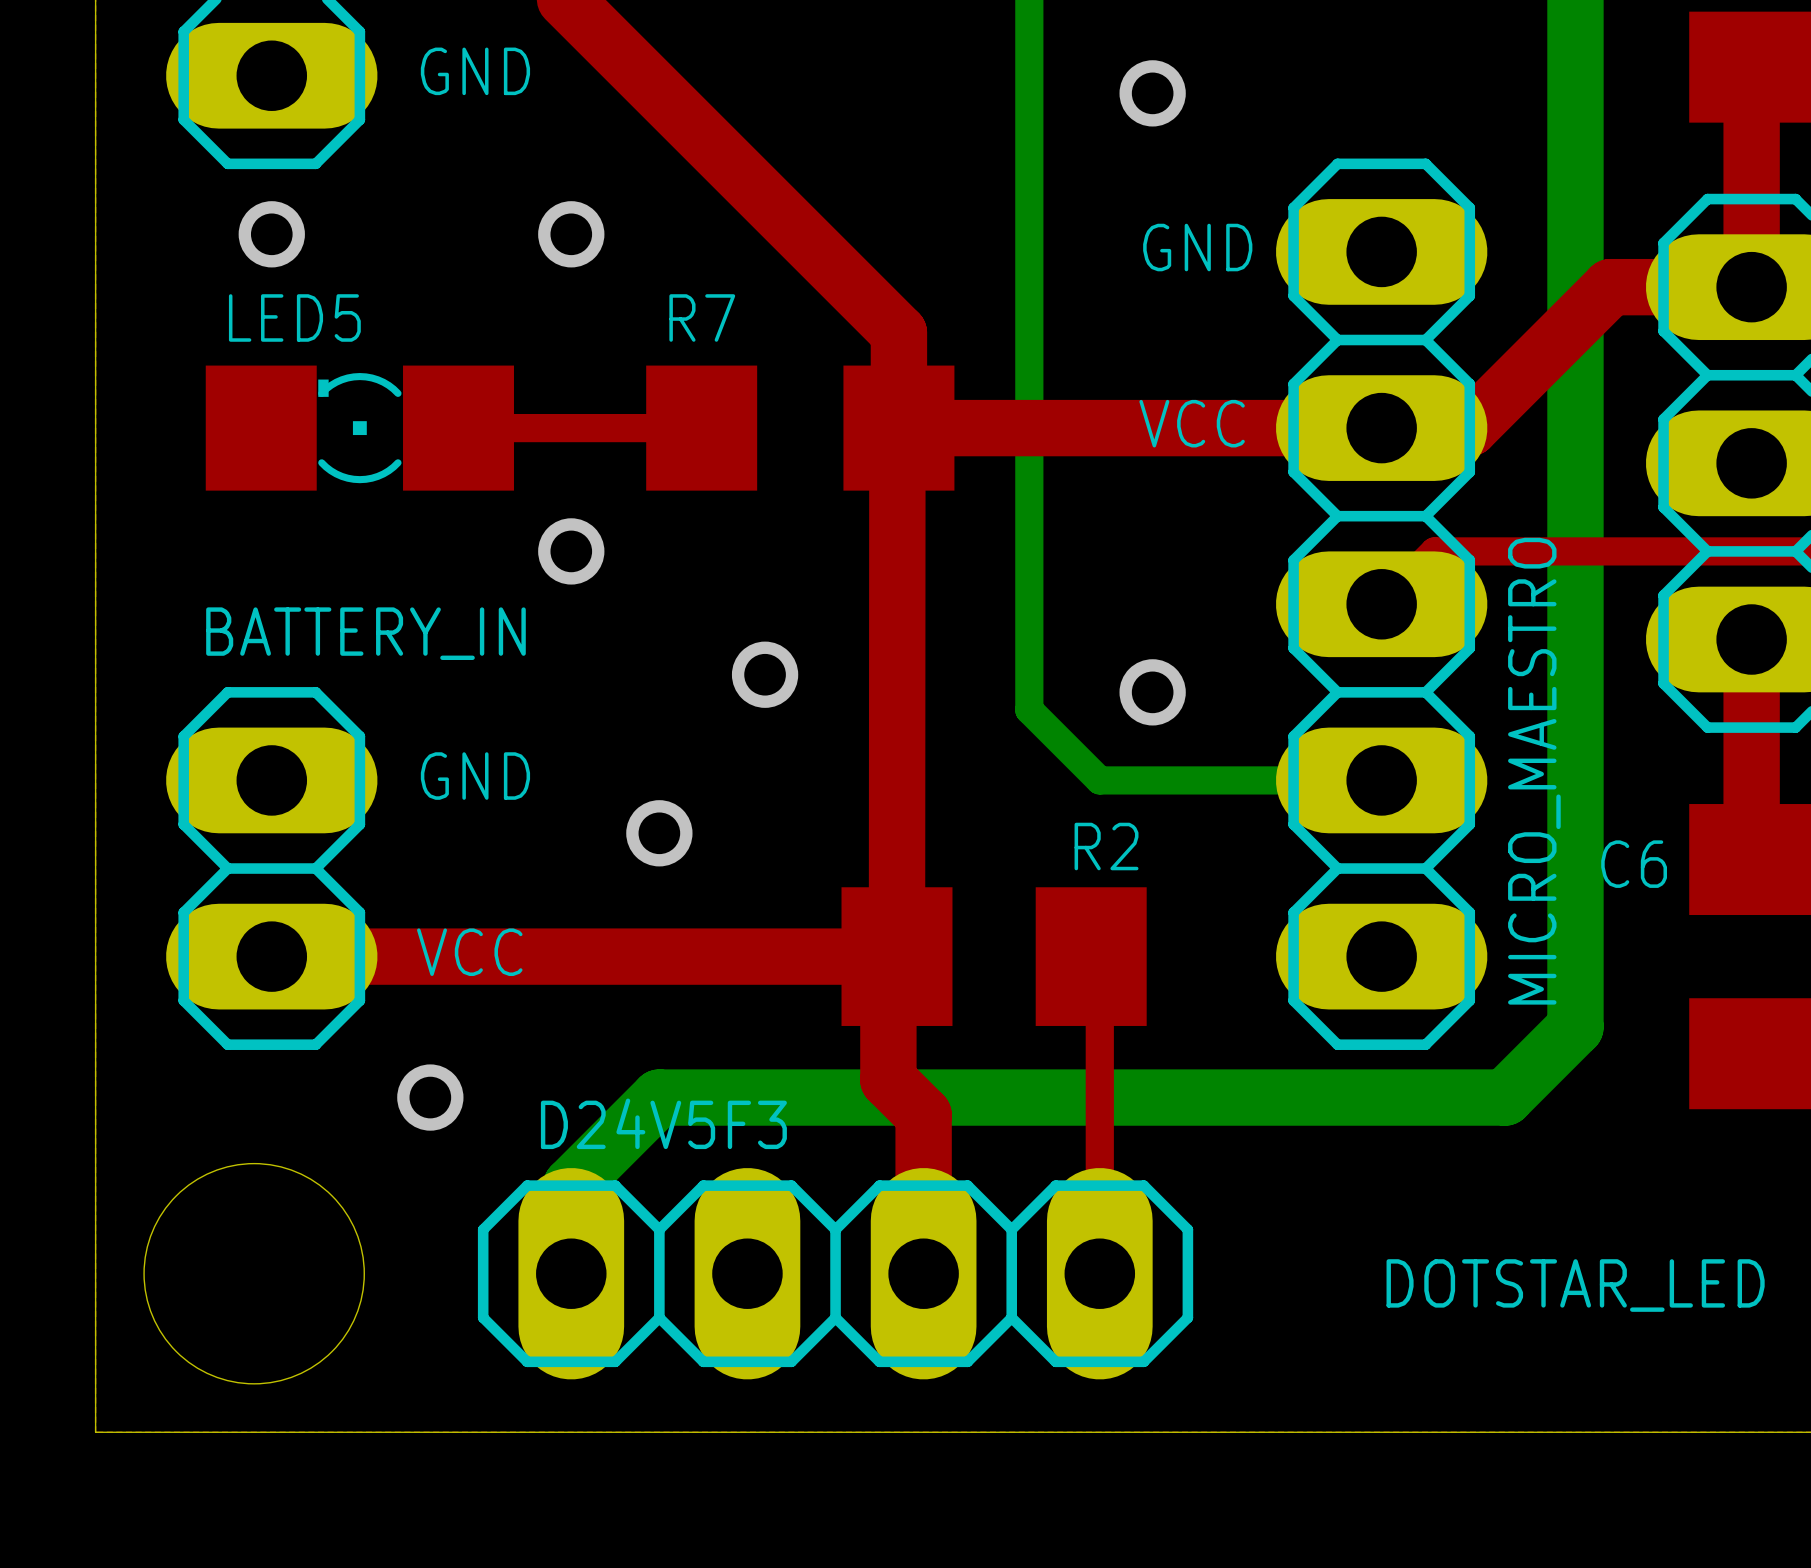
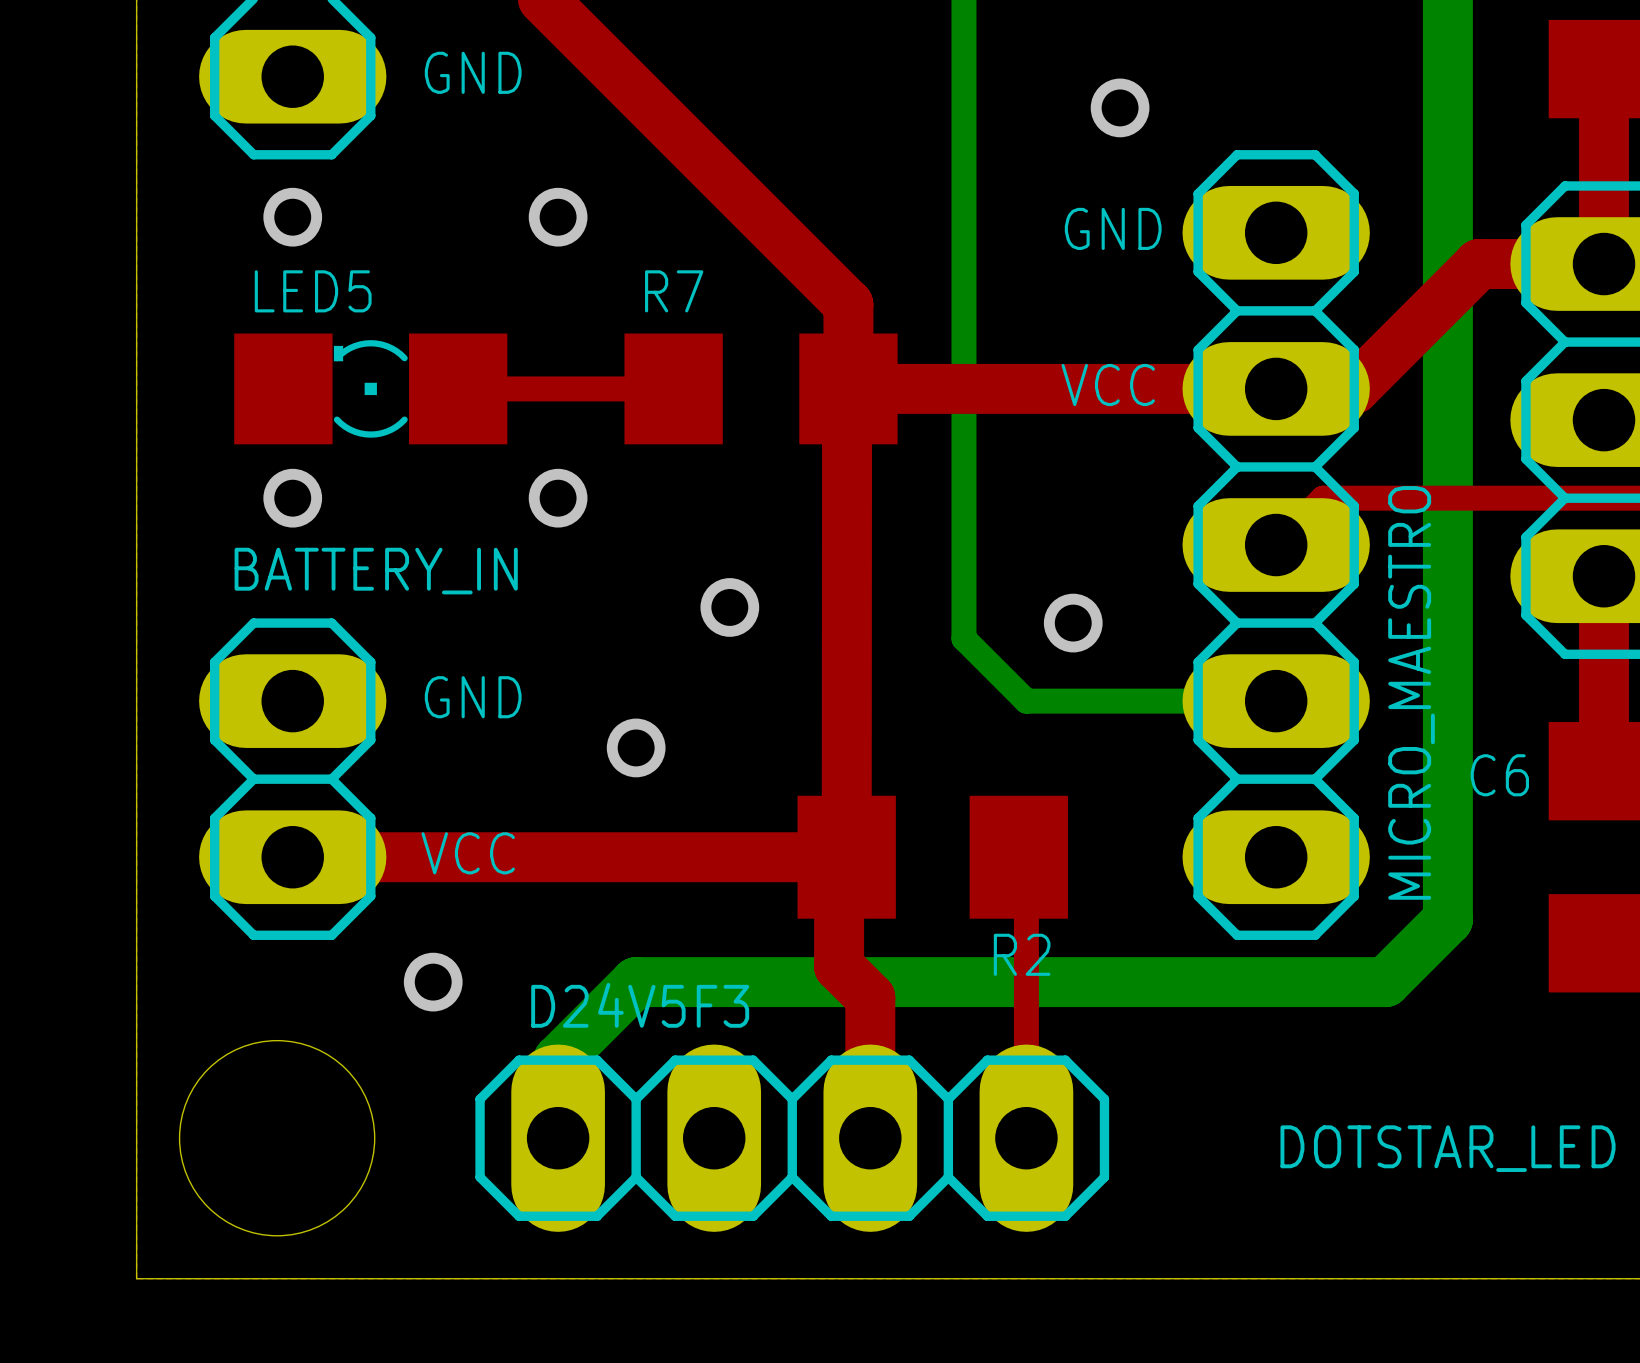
via position: (1152, 93) -> (1120, 107)
via: none -> (292, 498)
R2 name position: R2 (1106, 846) -> R2 (1022, 954)

